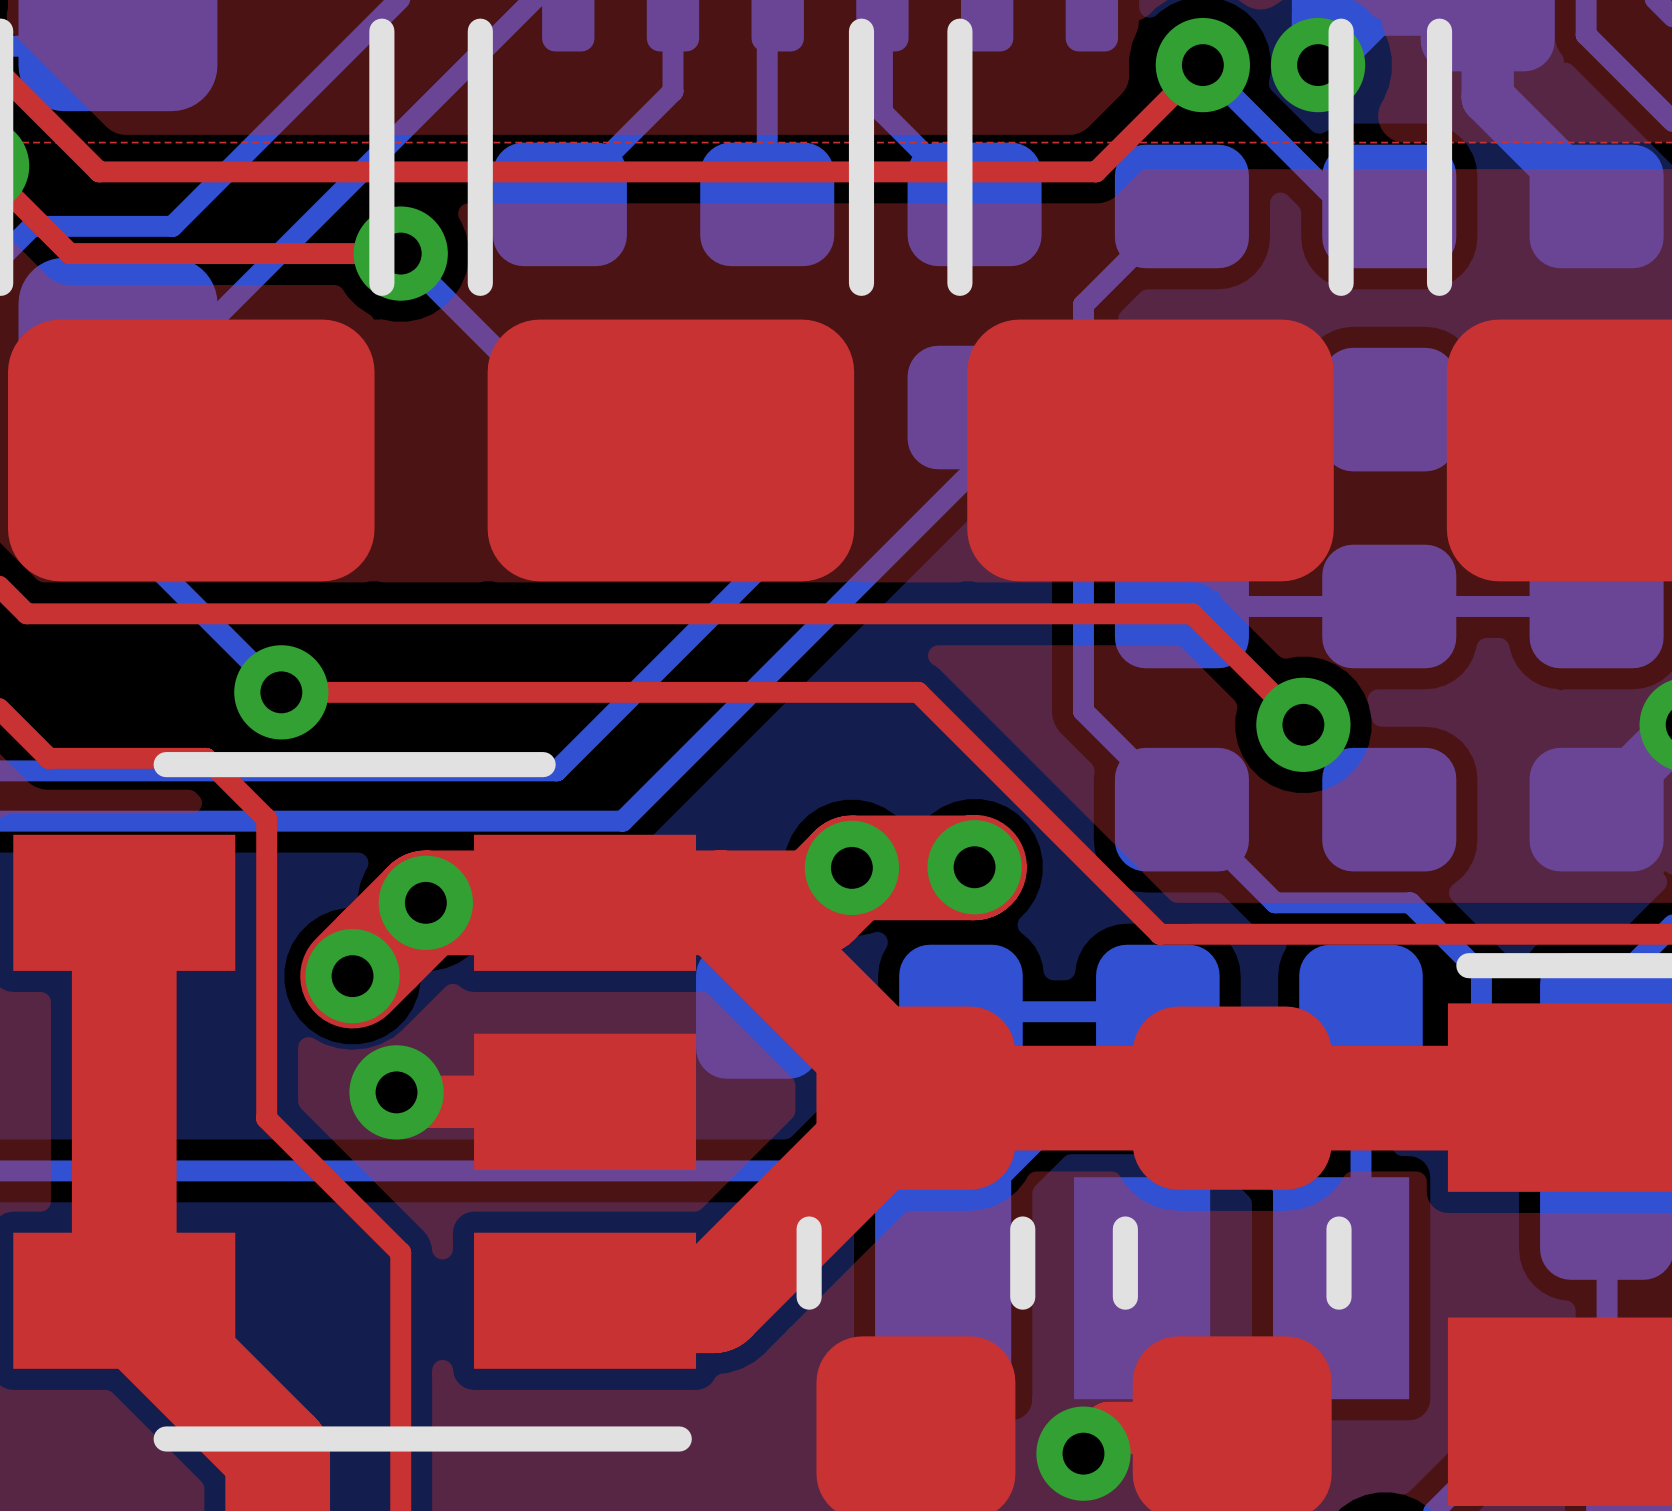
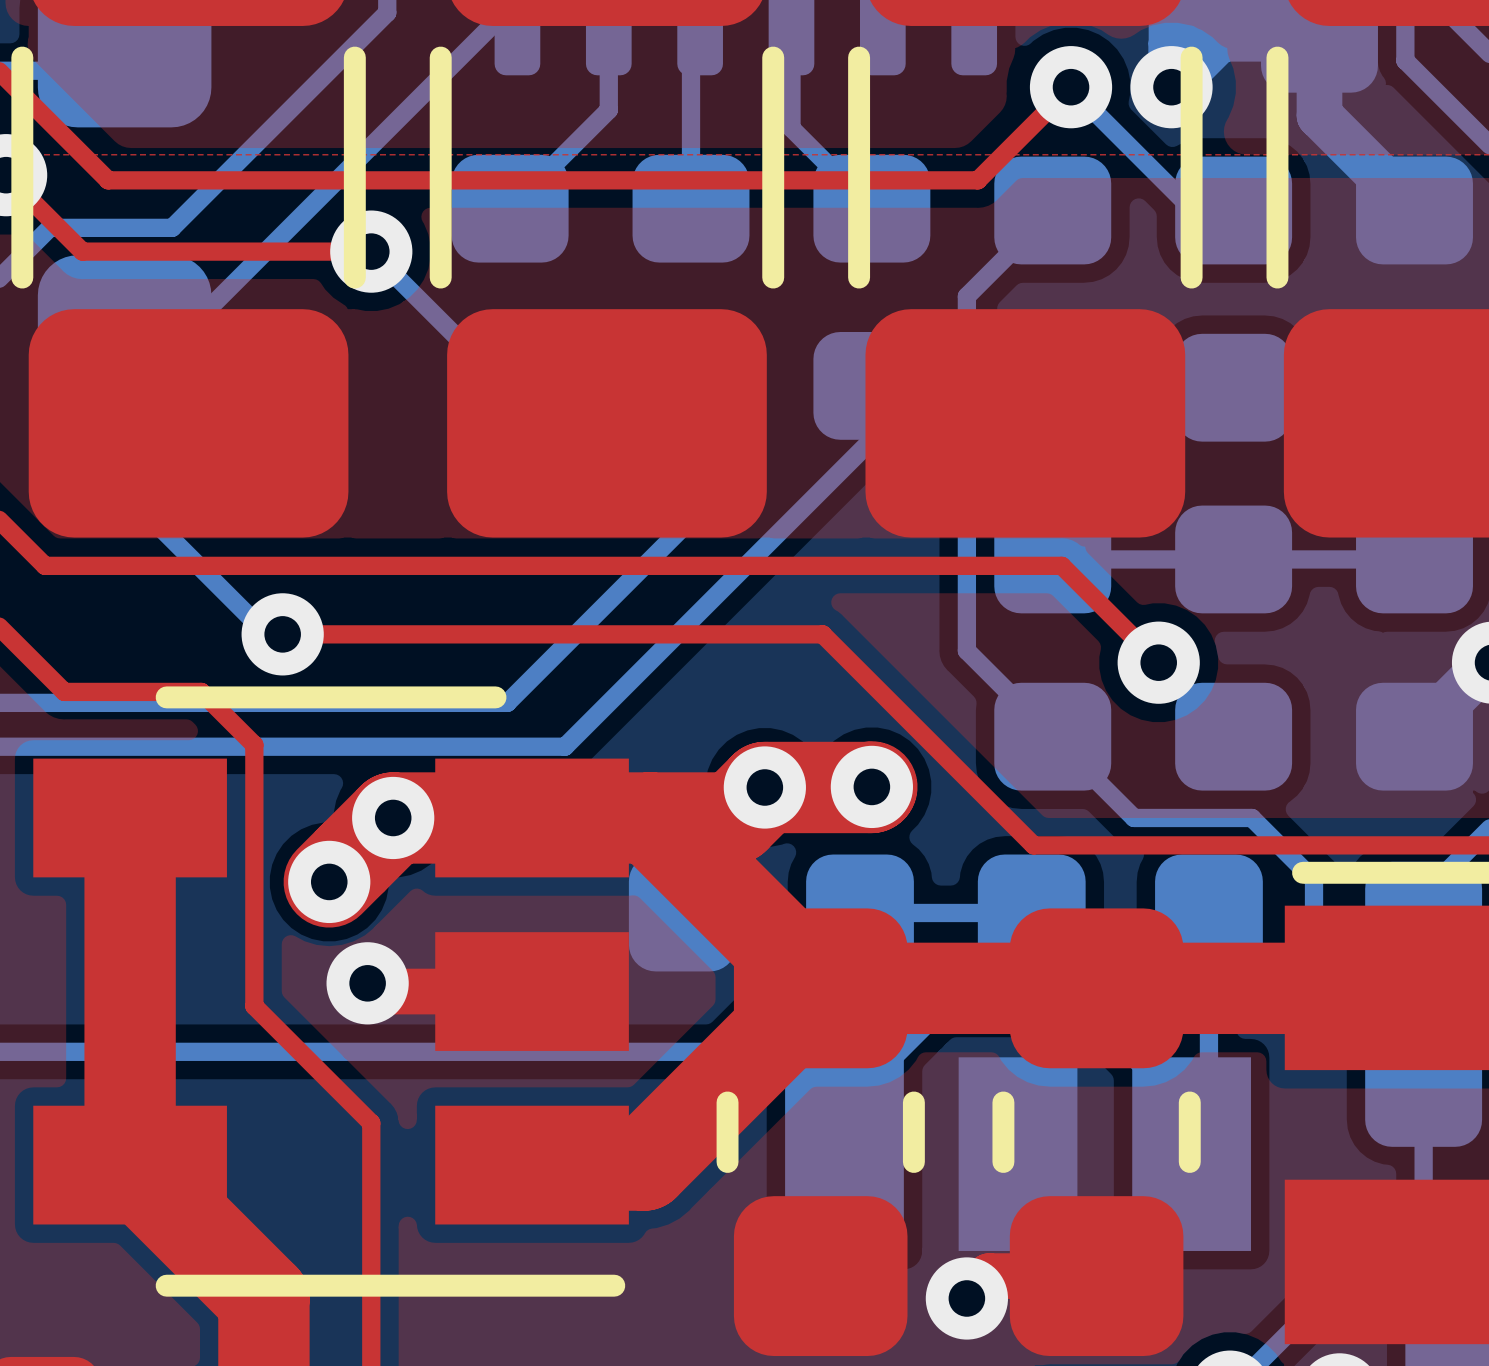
via position: (281, 692) -> (282, 634)

